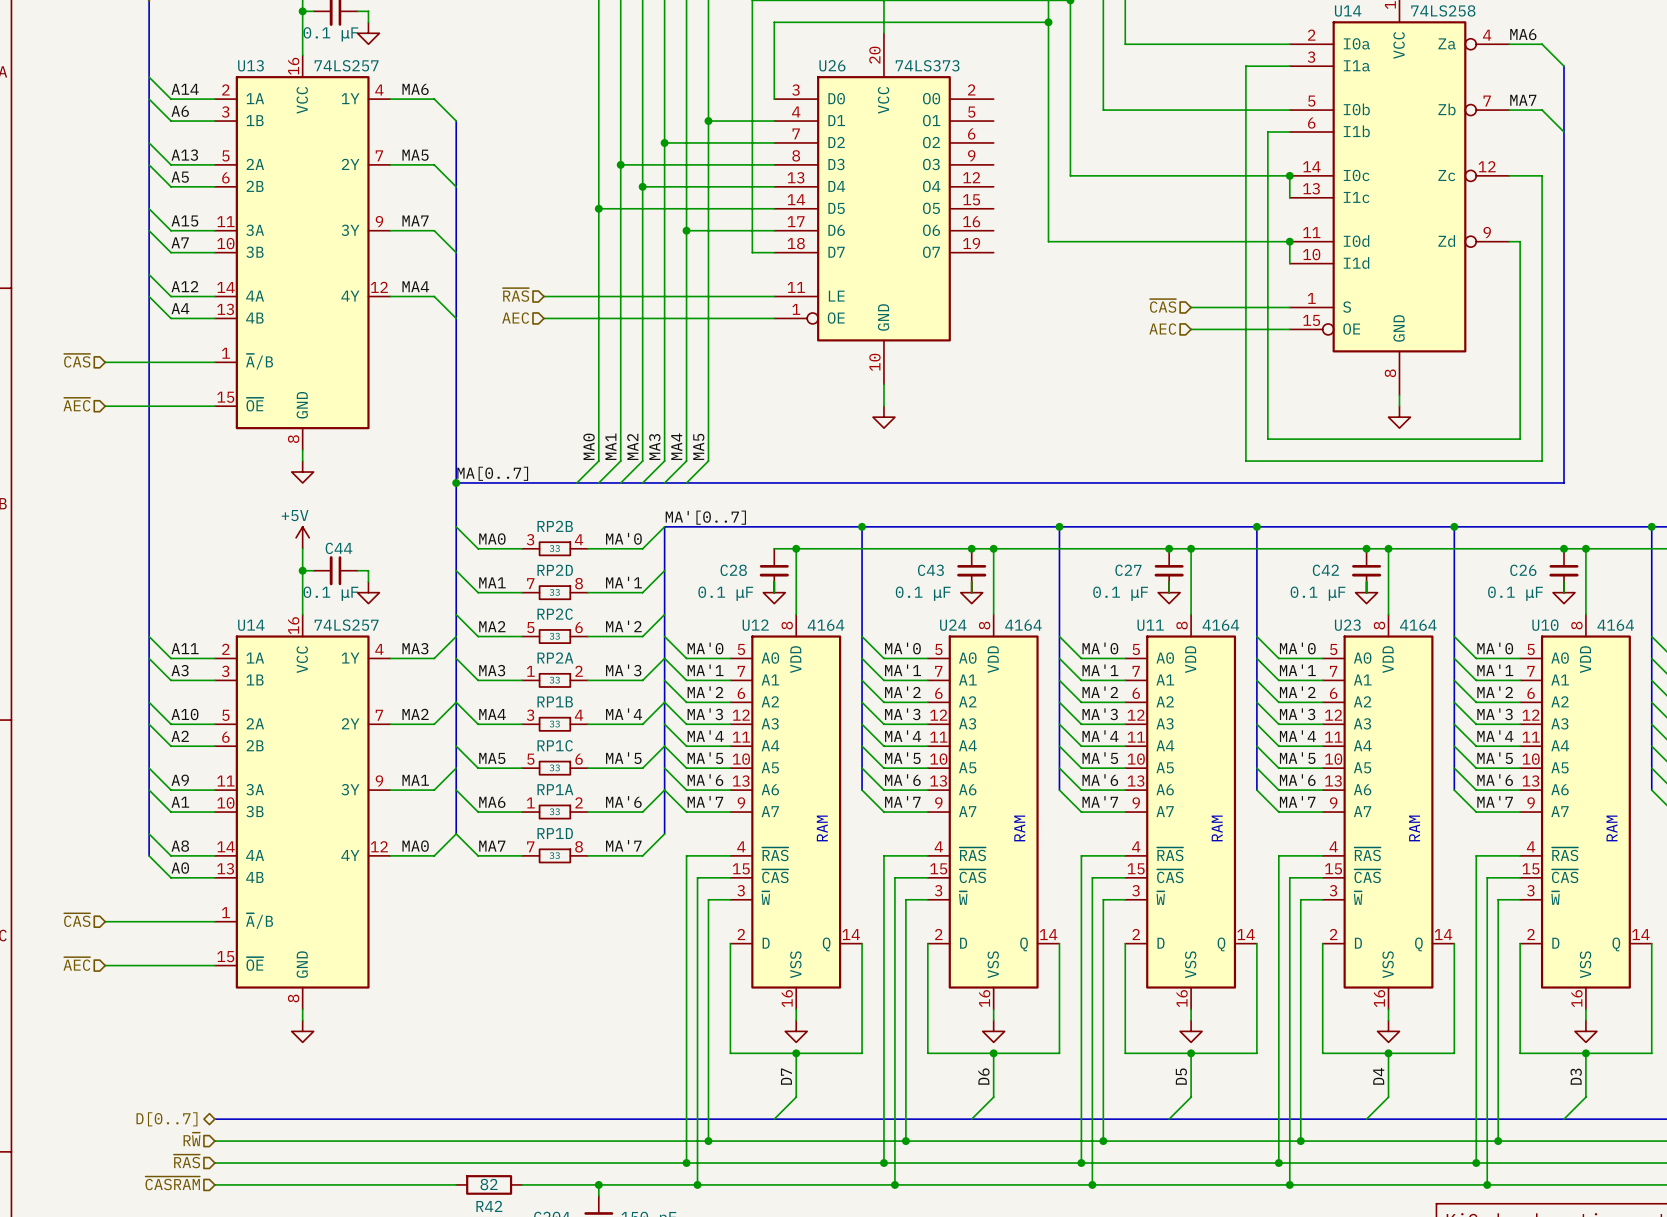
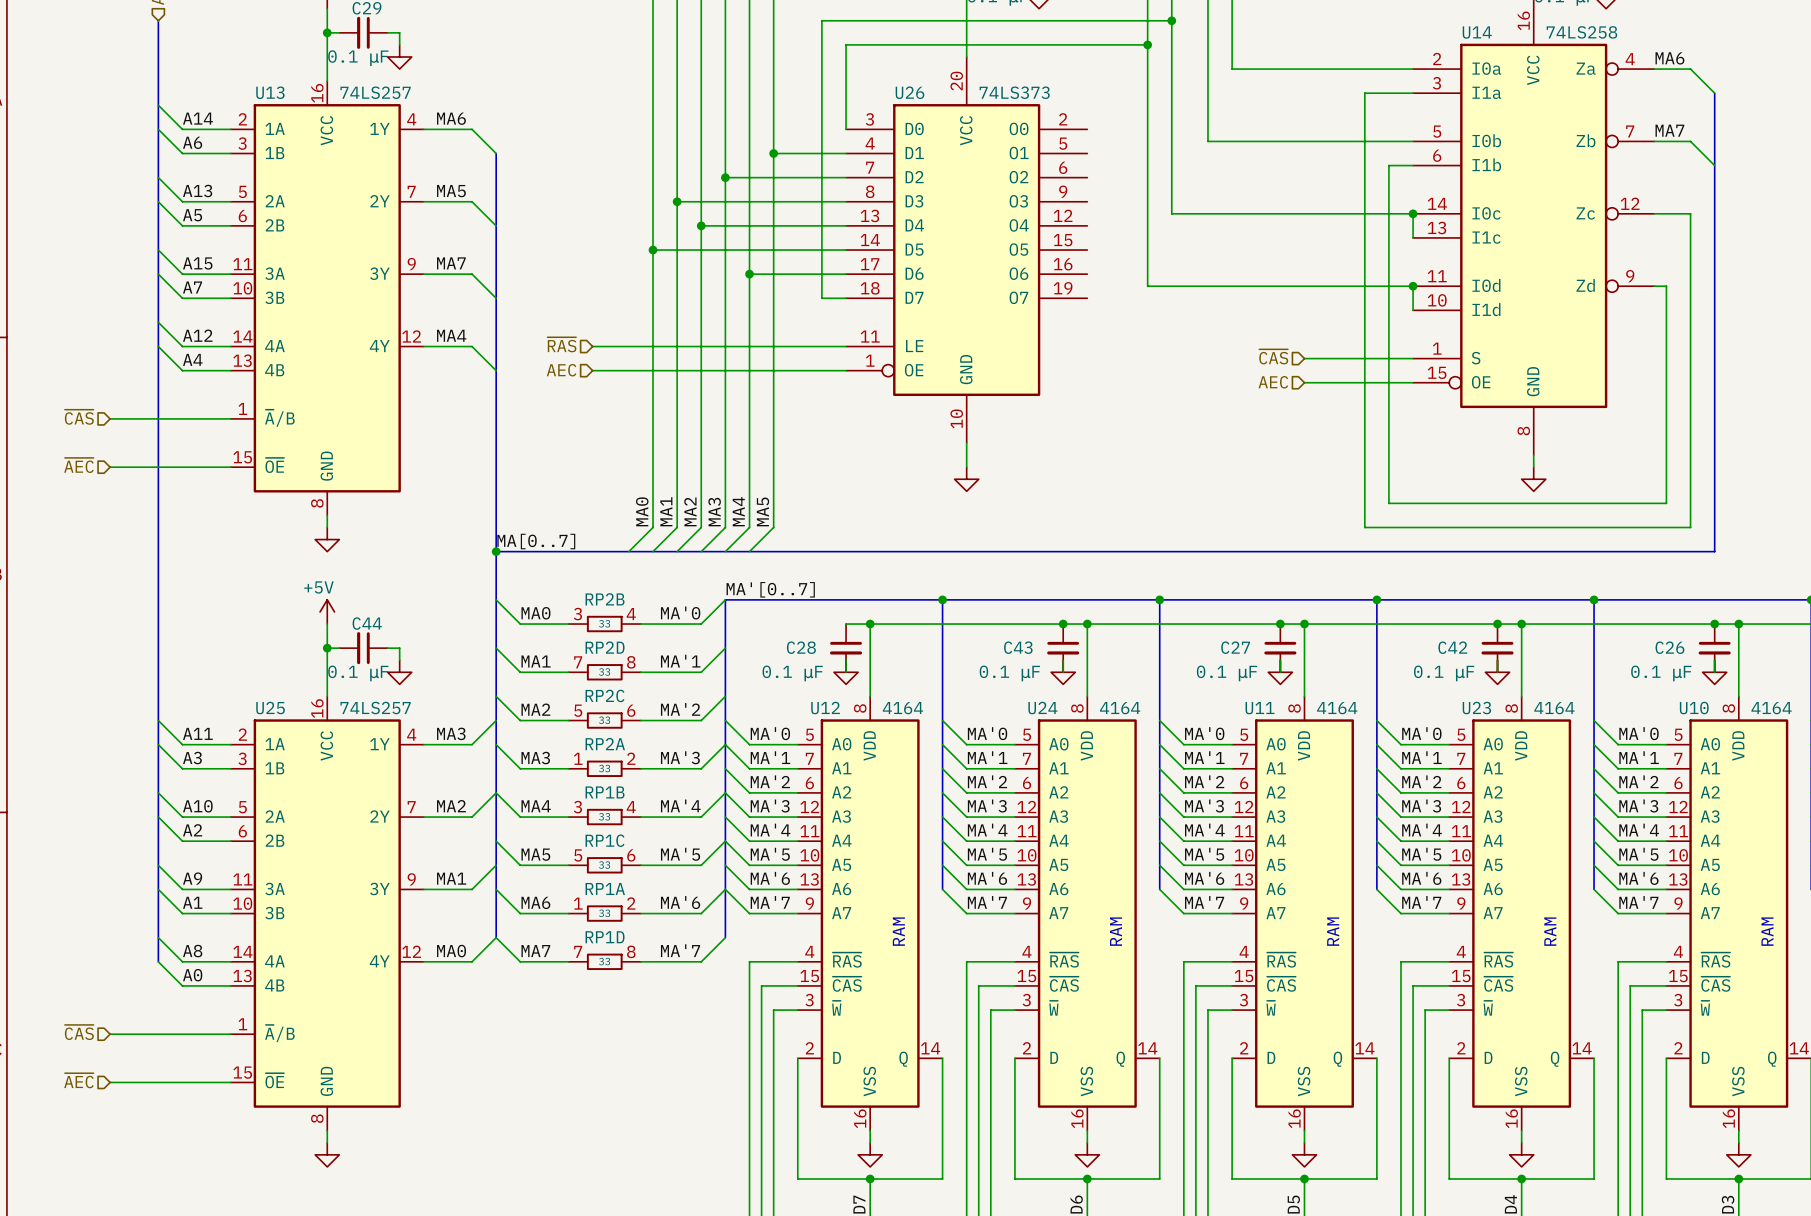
U14 name: U14 (251, 625) -> U25 (270, 708)

